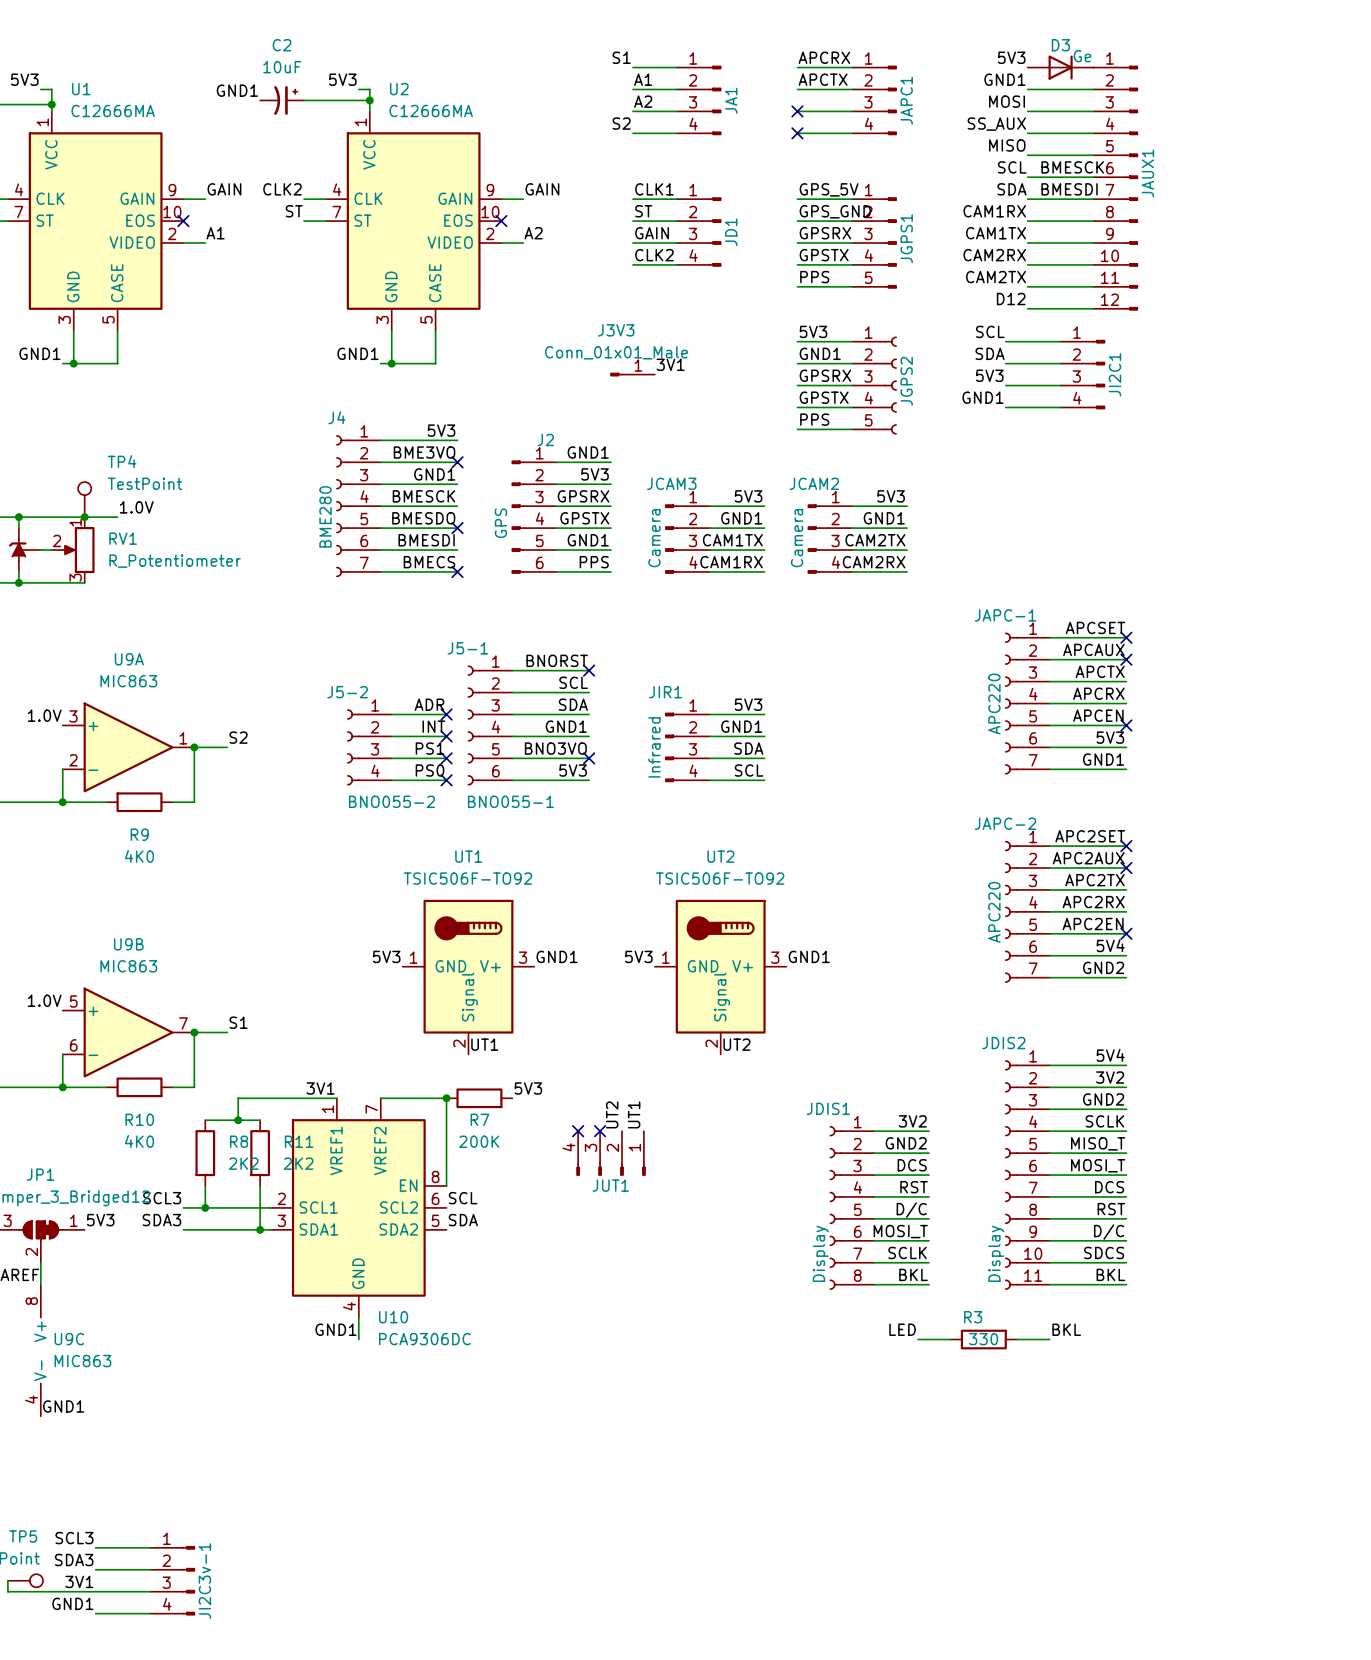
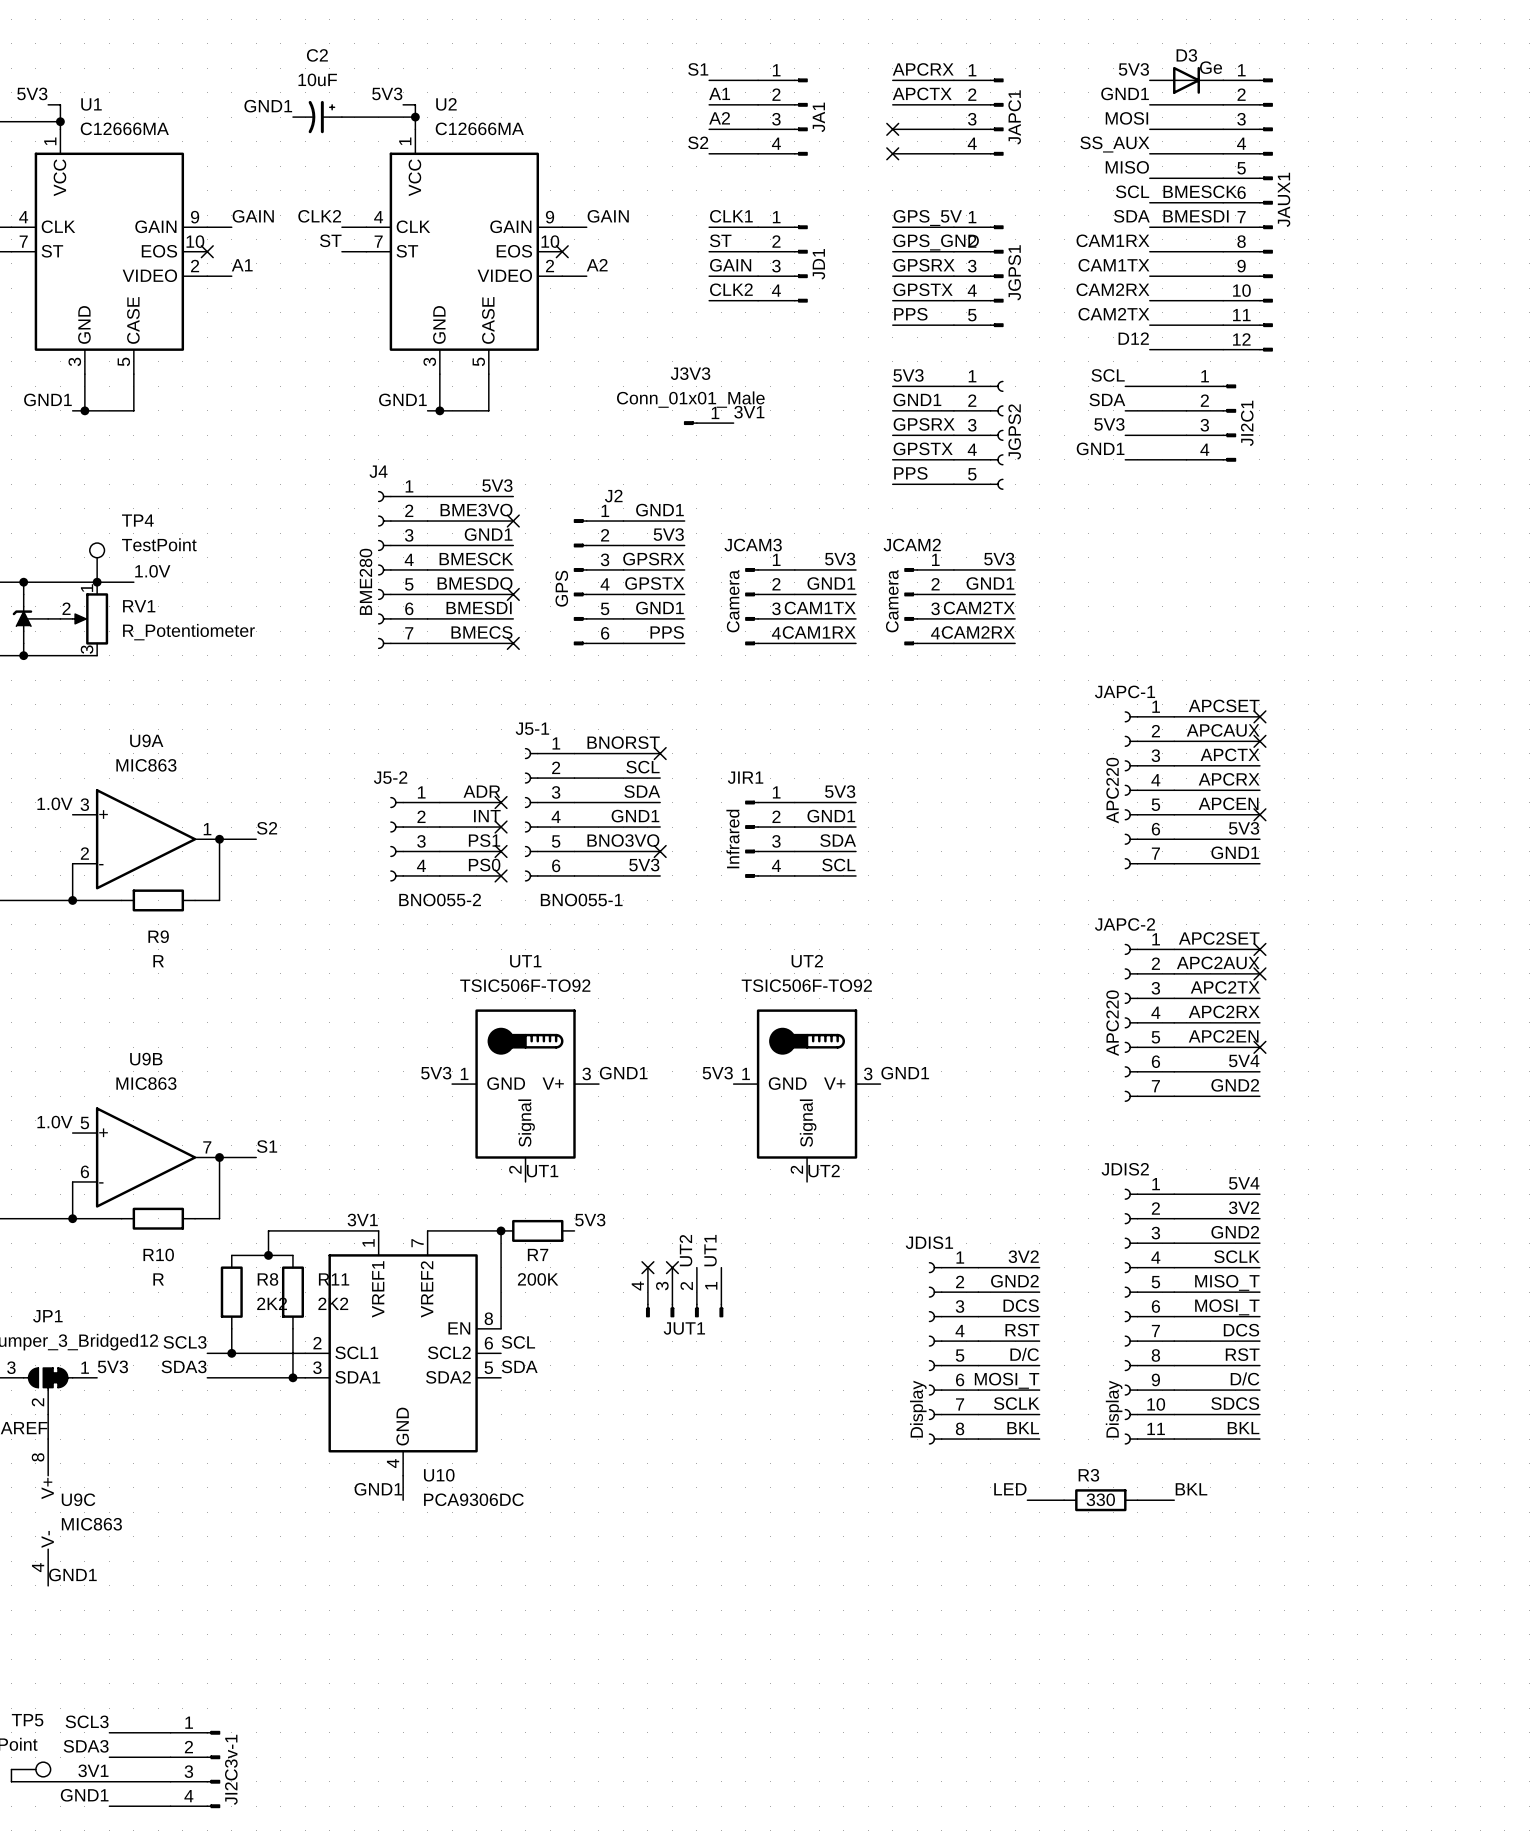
R9 value: 4K0 (139, 856) -> R (158, 961)
R10 value: 4K0 (139, 1141) -> R (158, 1279)

